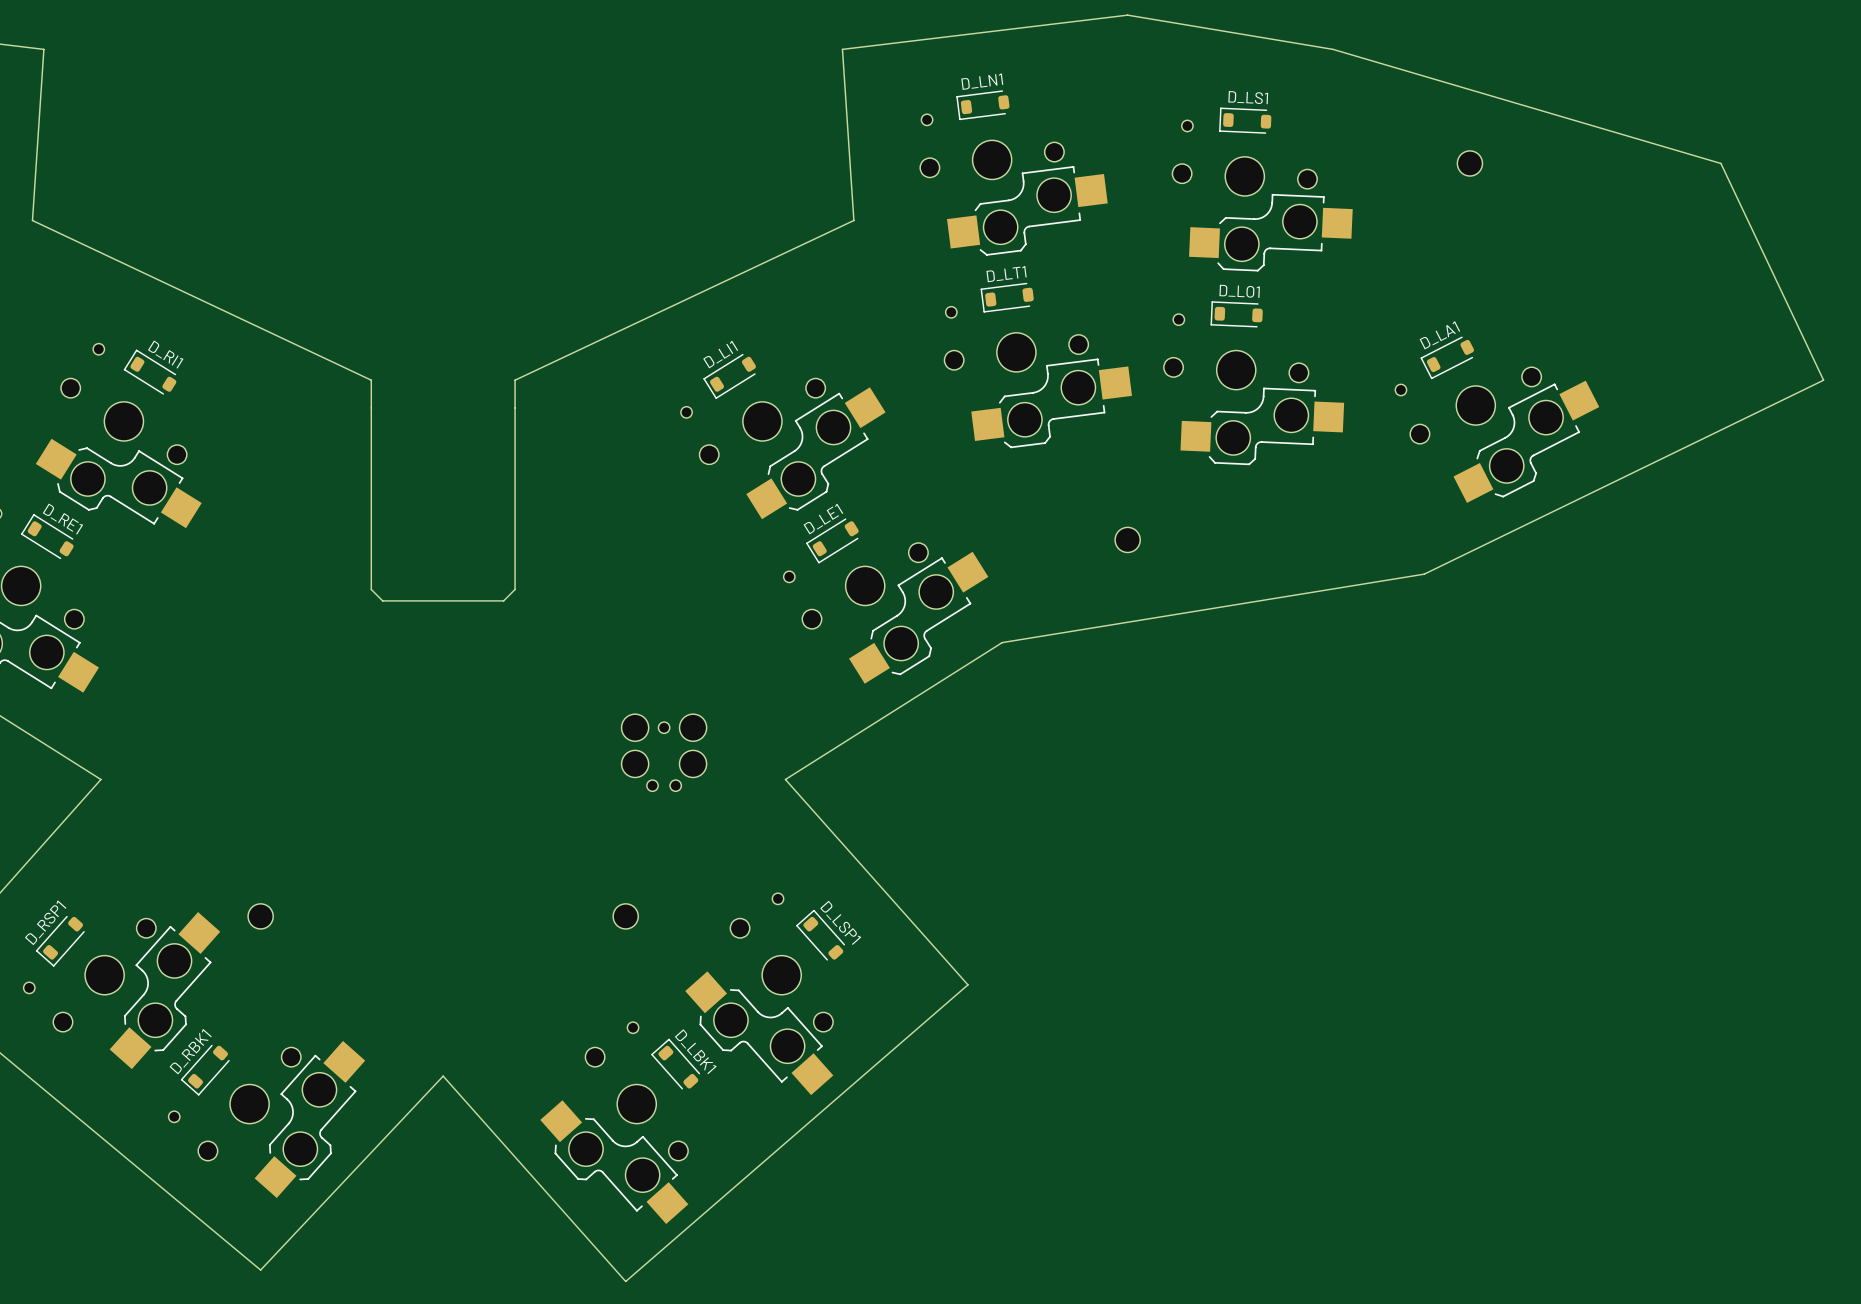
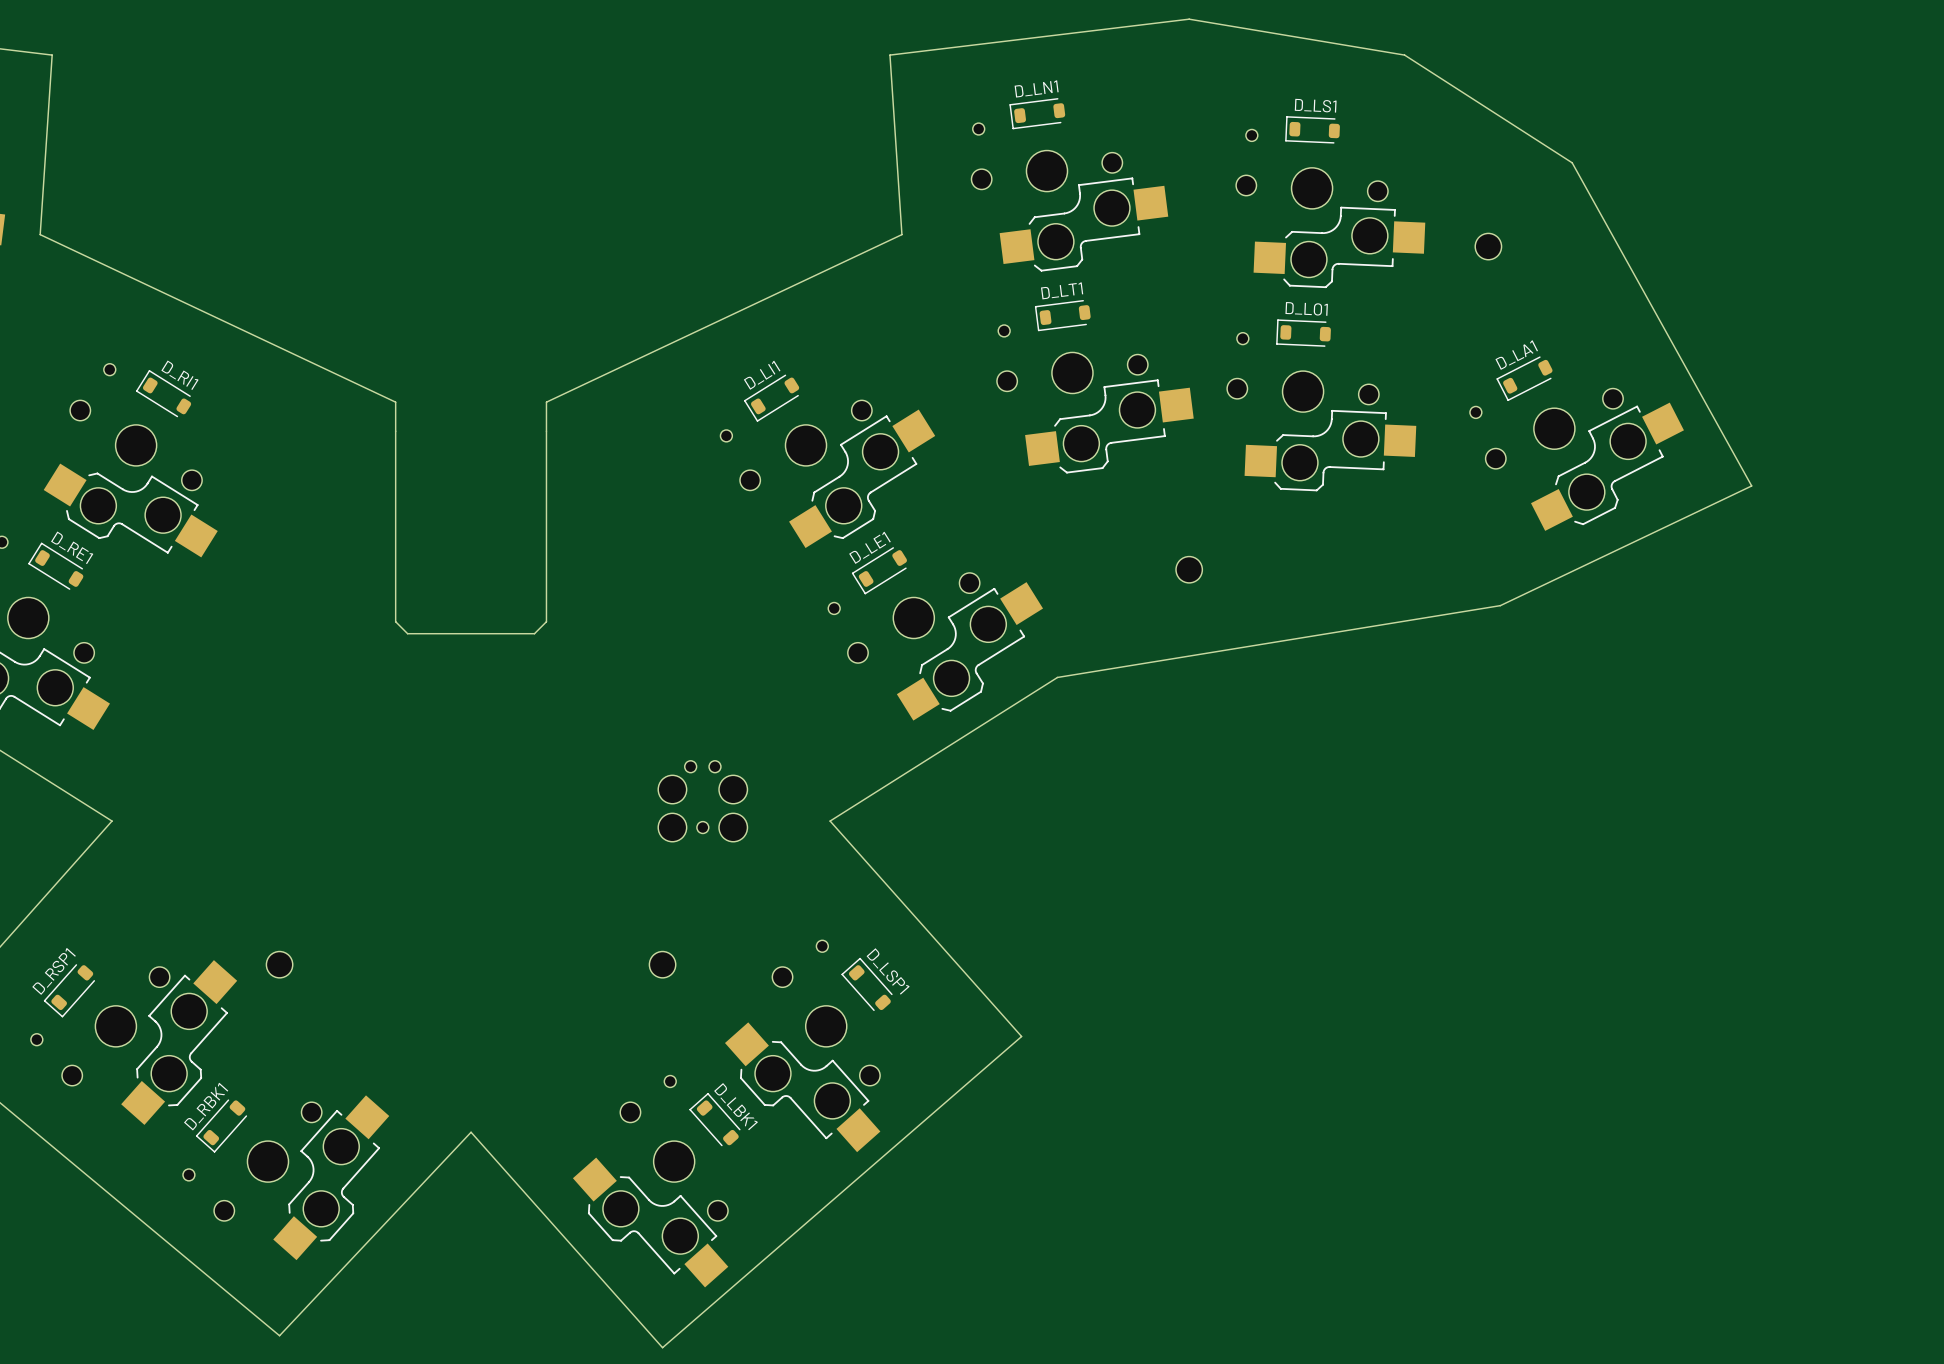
board edge: (1333, 49) (1720, 163) (1823, 380) (1424, 574) -> (1404, 55) (1572, 162) (1751, 485) (1500, 605)
part position: (1469, 163) -> (1488, 246)
part rotation: 0° (664, 752) -> 180° (702, 801)

